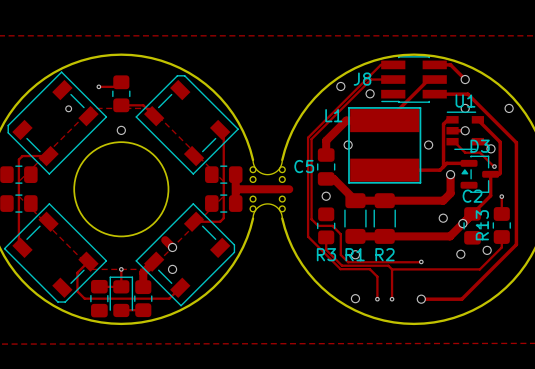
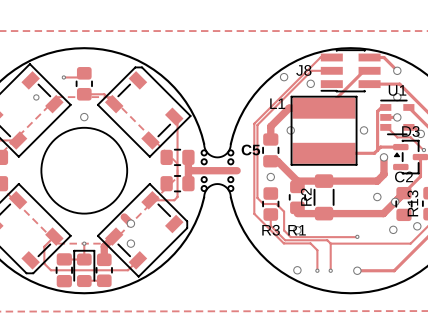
R1 footprint: [344, 193, 367, 244] -> [289, 180, 306, 215]
R2 name rotation: 0° (385, 254) -> 90° counterclockwise (306, 197)
R2 name position: R2 (385, 254) -> R2 (306, 197)

